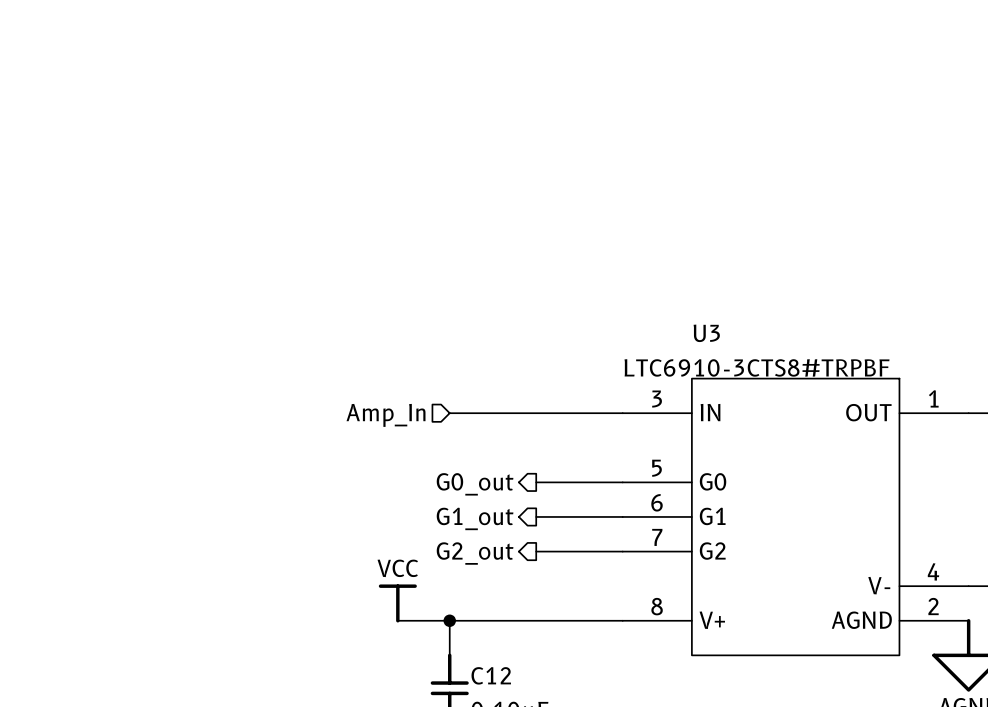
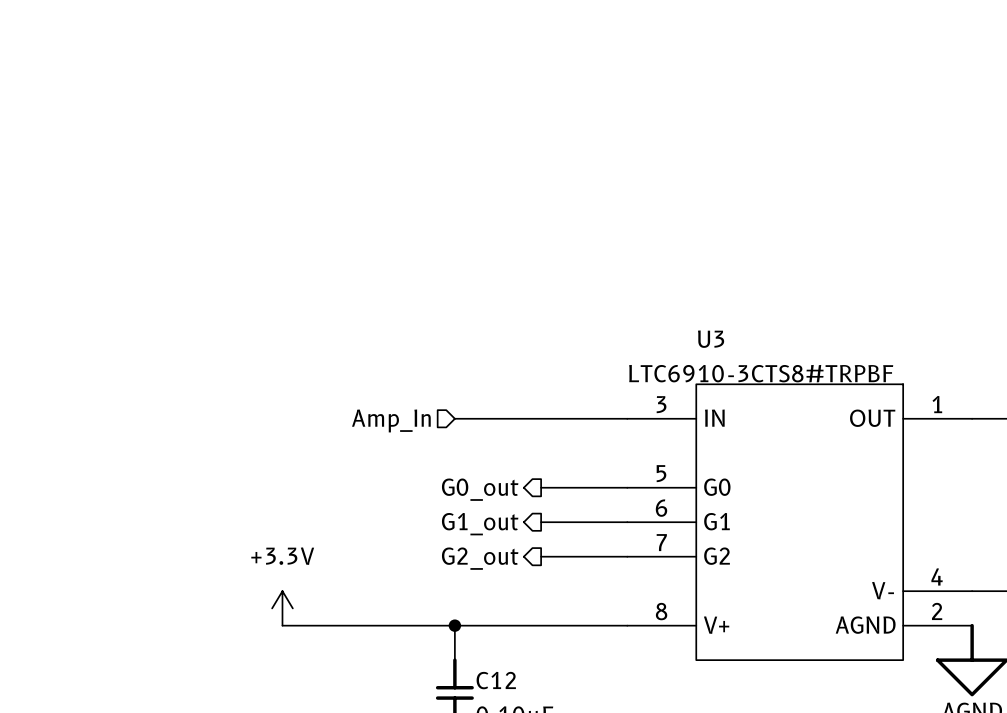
power symbol: none -> +3.3V (282, 608)
power symbol: VCC (397, 603) -> none
wire: none -> (282, 625) (403, 625)

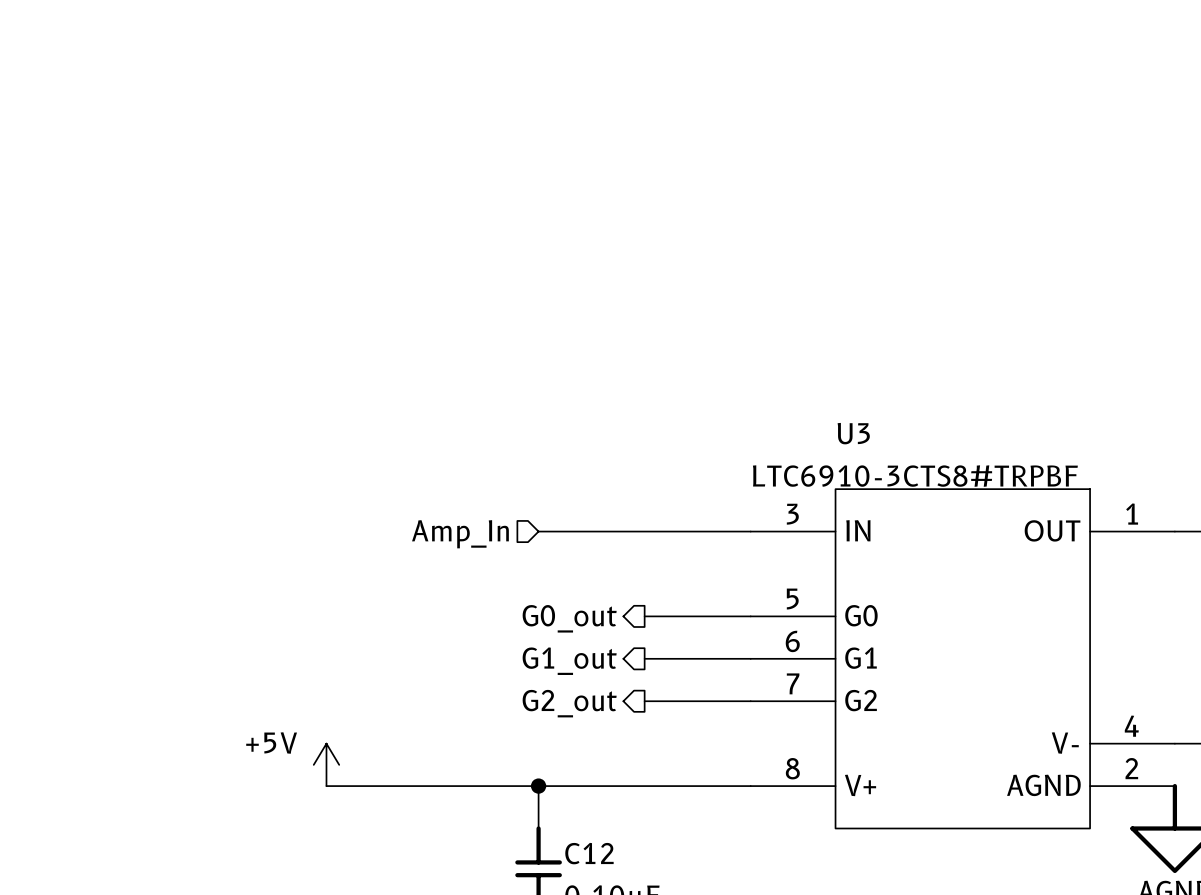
power symbol: +3.3V (282, 608) -> +5V (326, 764)

